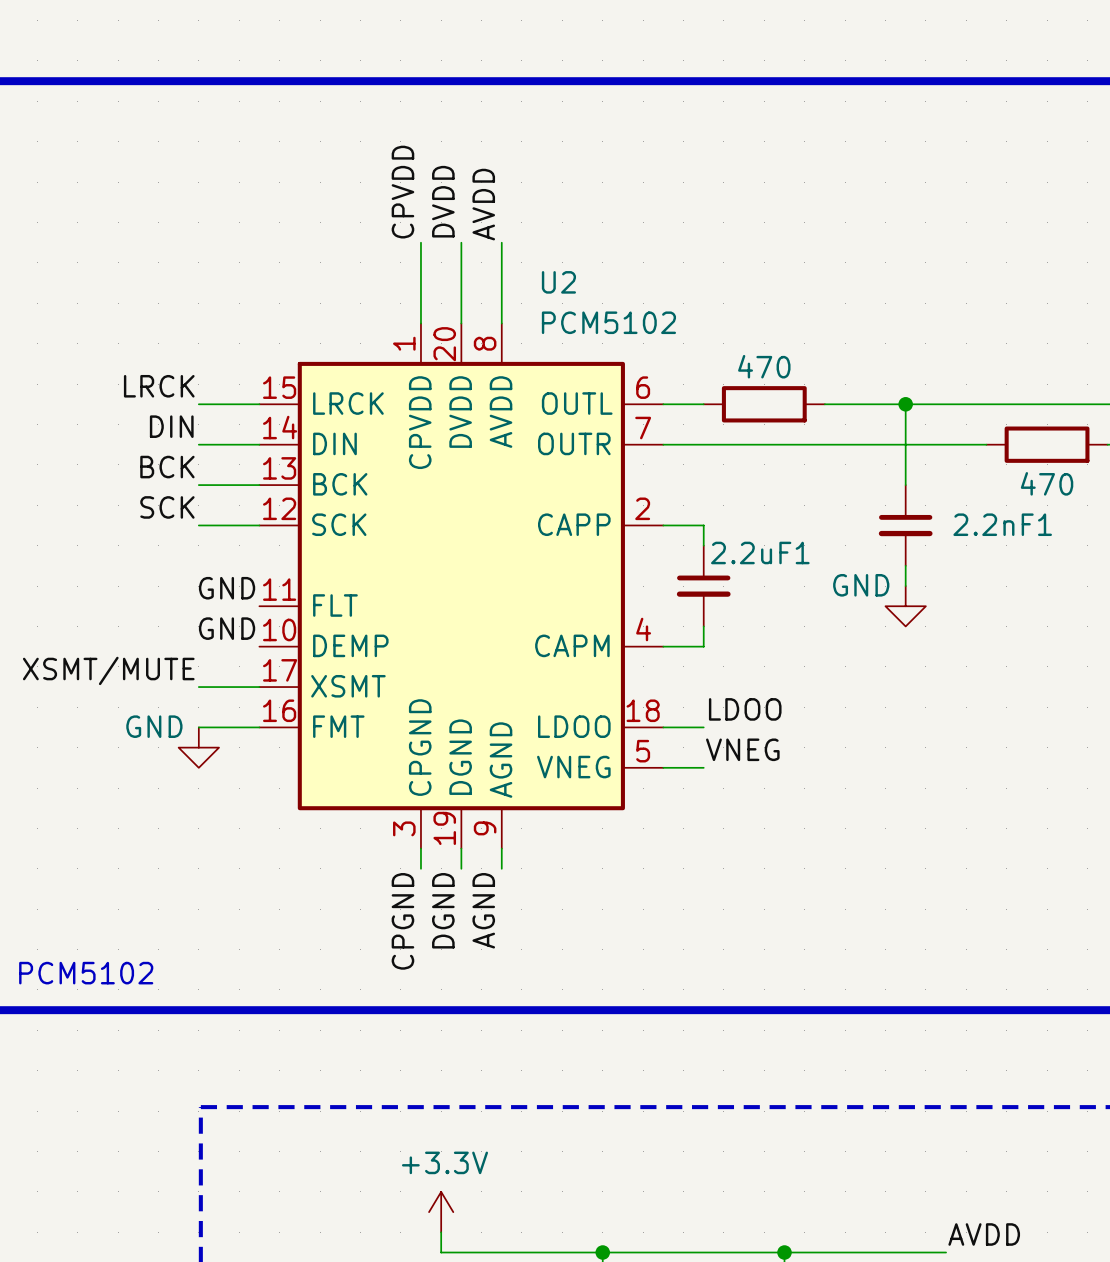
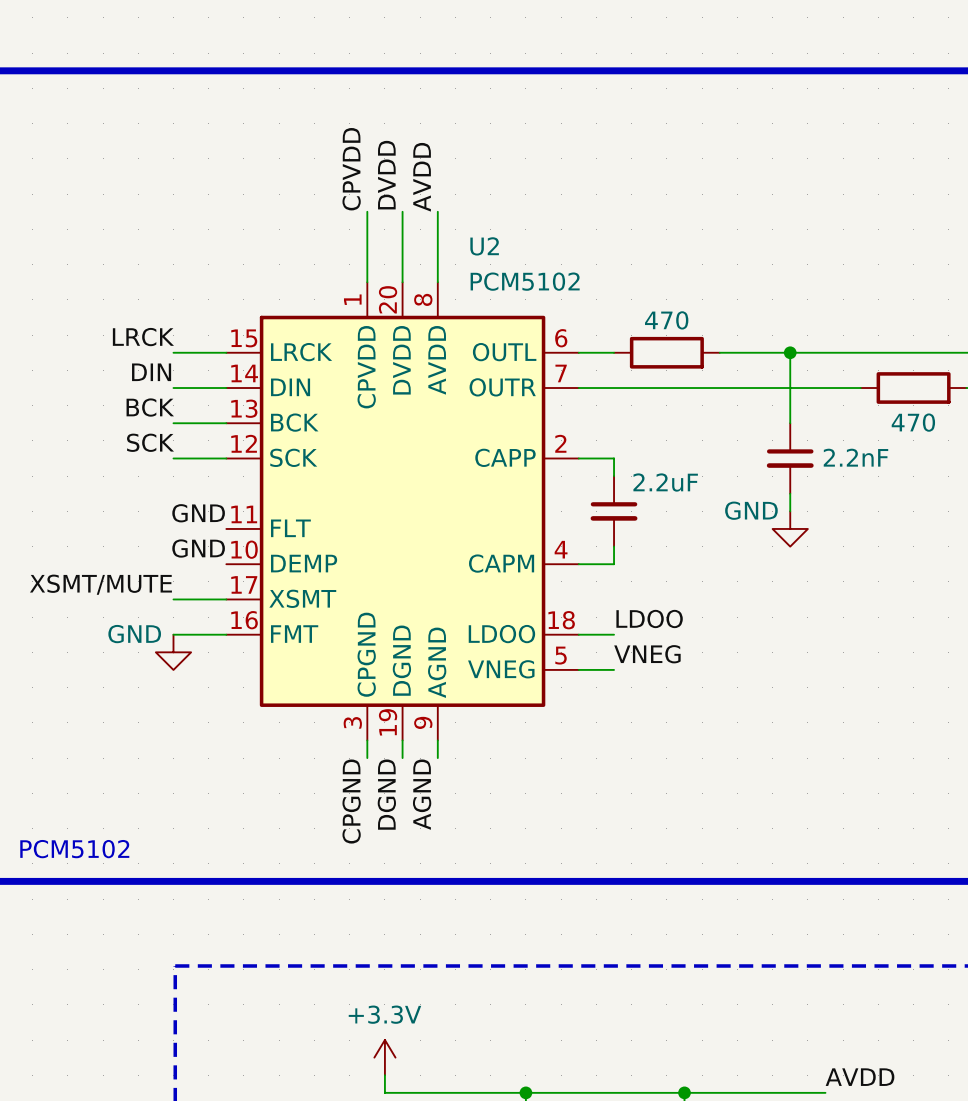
2.2nF1 value: none -> 2.2nF (855, 457)
2.2nF1 name: 2.2nF1 (1002, 524) -> none
2.2uF1 name: 2.2uF1 (760, 552) -> none
2.2uF1 value: none -> 2.2uF (665, 482)

